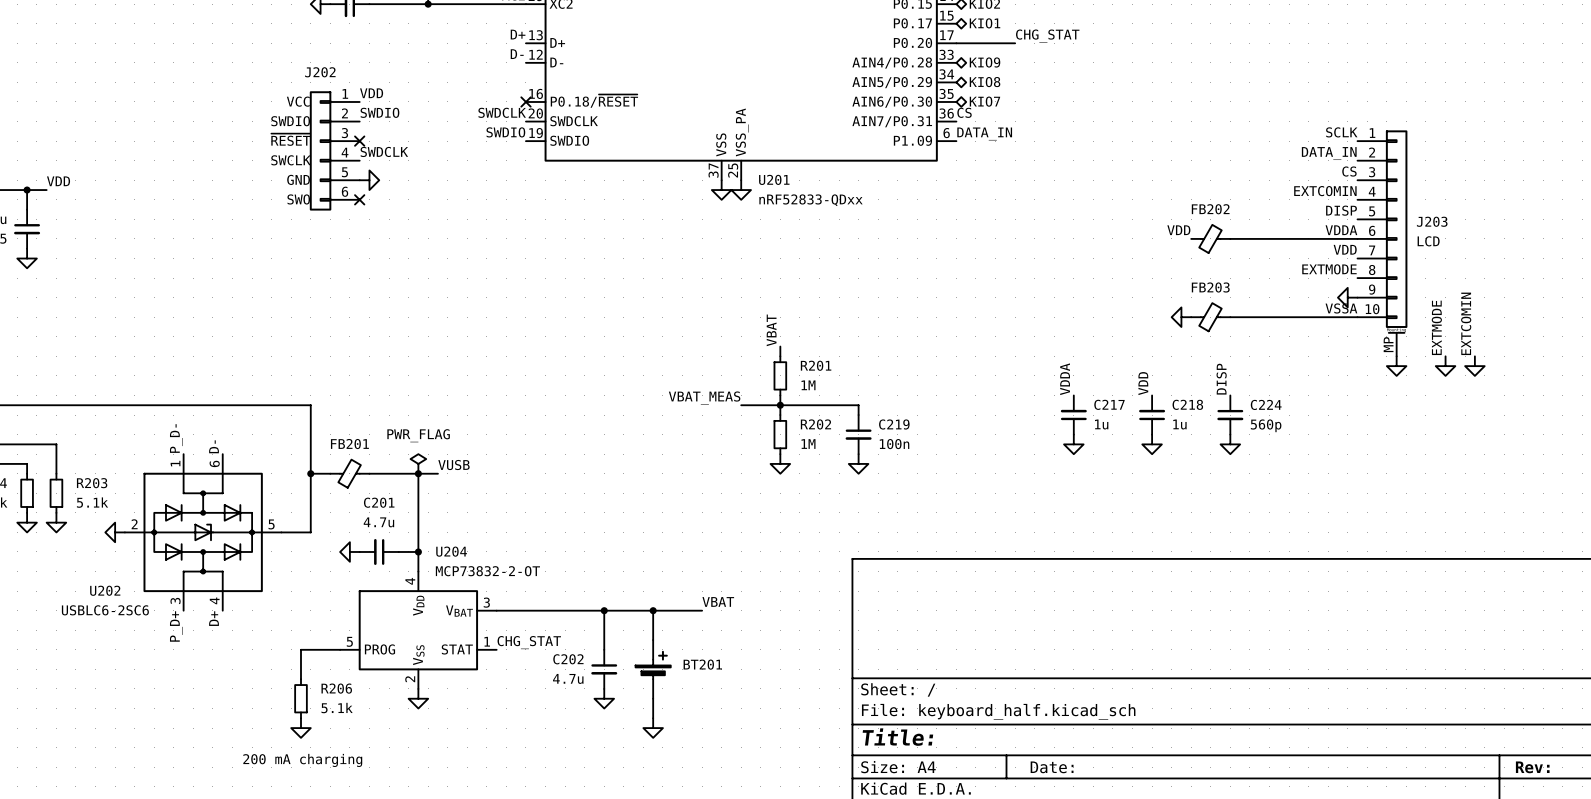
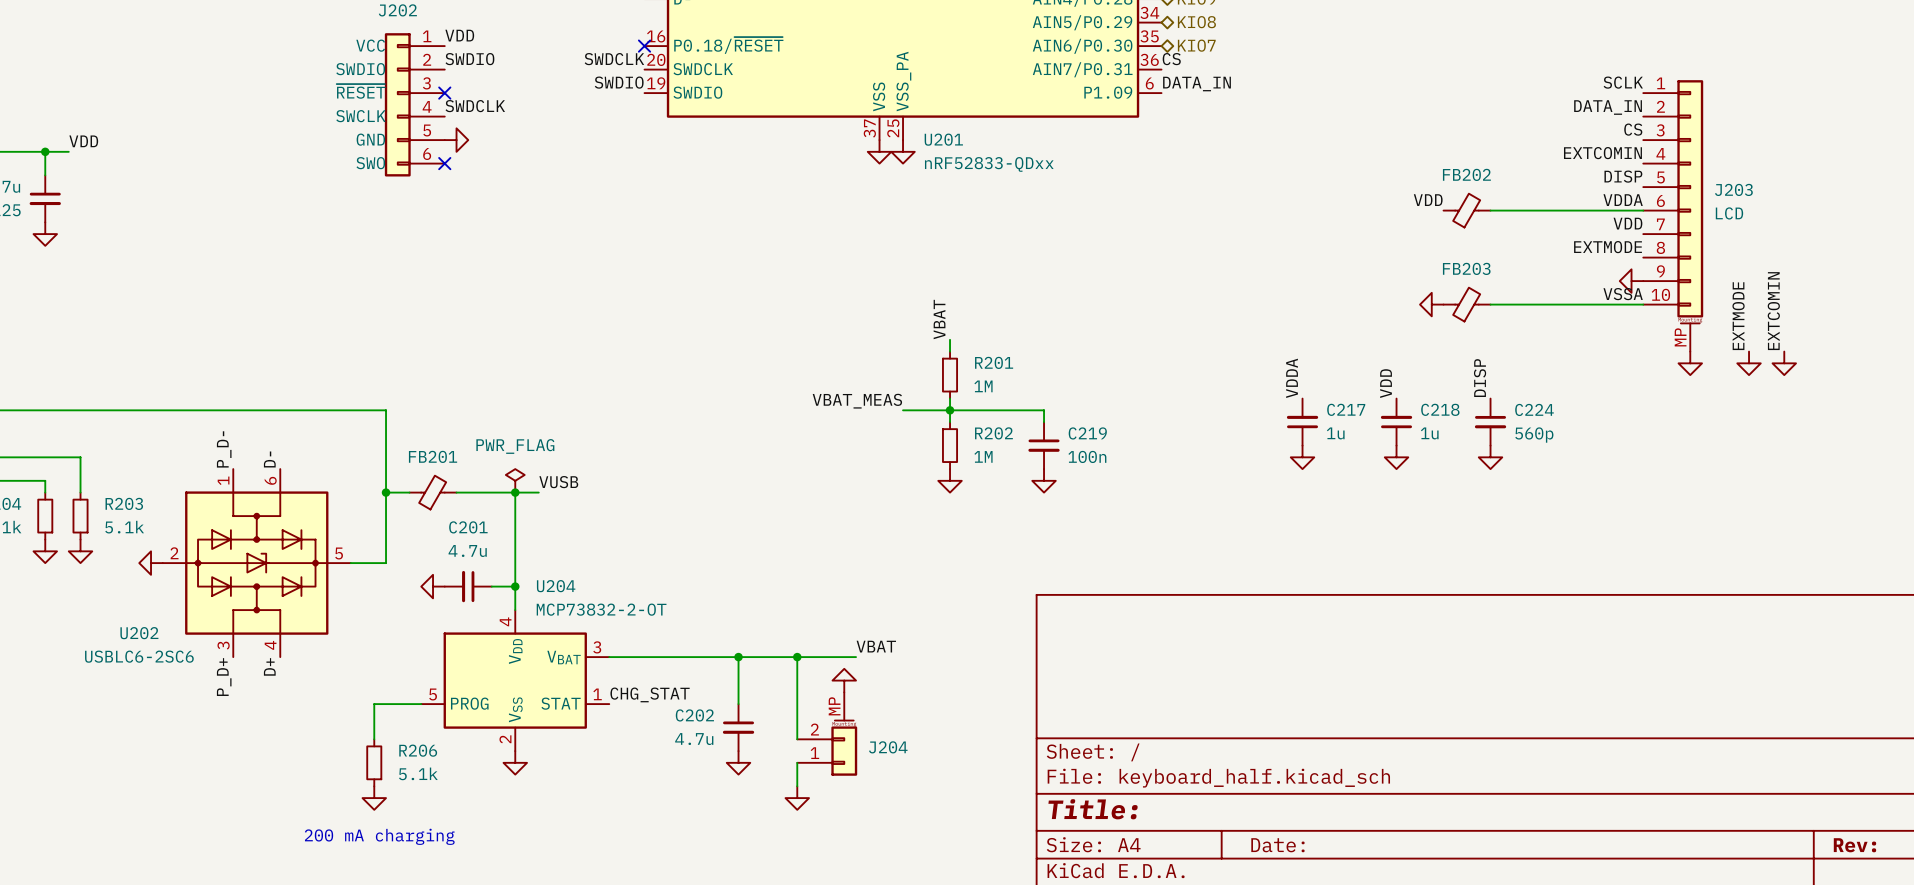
power symbol: none -> (844, 680)
BT201: (653, 669) -> none
J204: none -> (827, 734)

